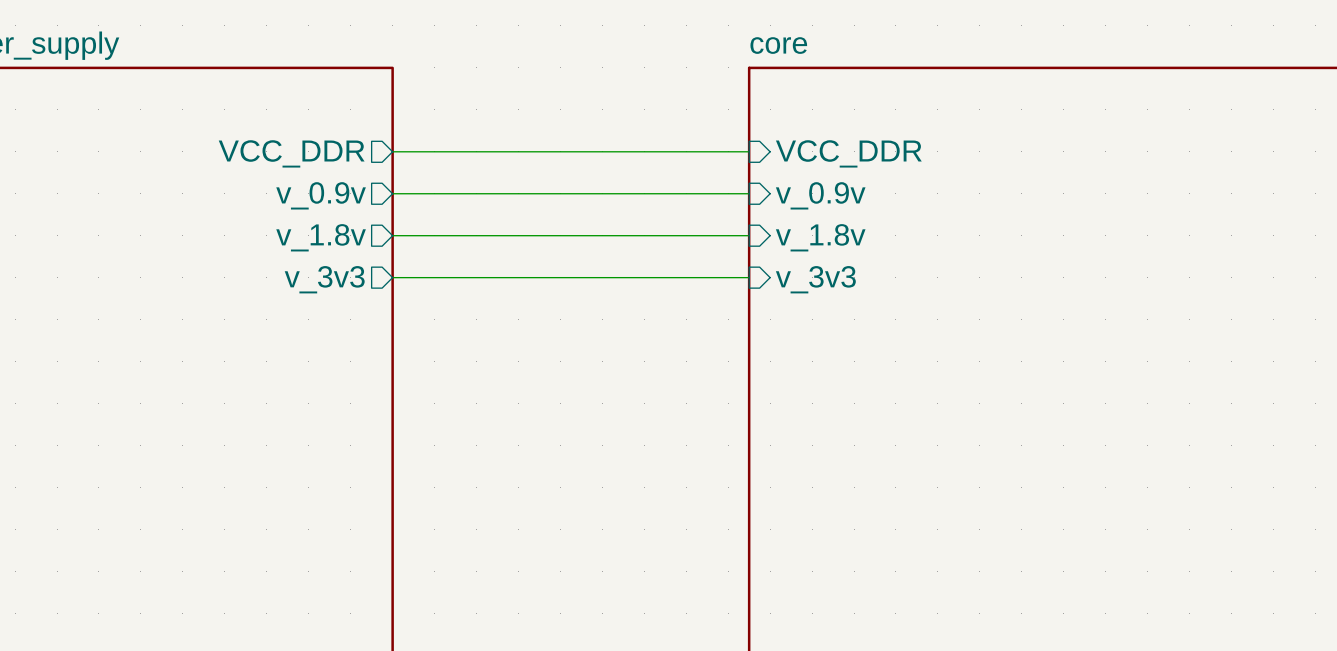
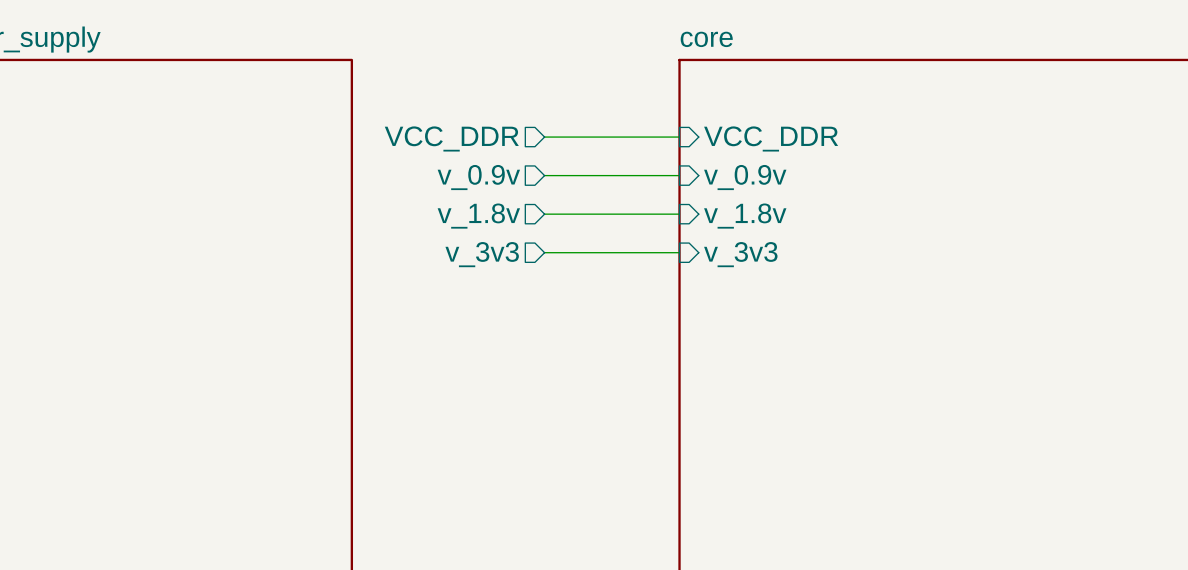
wire: (392, 151) (602, 151) -> none
sheet pin position: VCC_DDR (291, 153) -> VCC_DDR (451, 138)
wire: (392, 193) (602, 193) -> none
sheet pin position: v_0.9v (321, 195) -> v_0.9v (478, 177)
wire: (392, 235) (602, 235) -> none
sheet pin position: v_1.8v (321, 237) -> v_1.8v (478, 216)
wire: (392, 277) (602, 277) -> none
sheet pin position: v_3v3 (324, 279) -> v_3v3 (482, 254)

